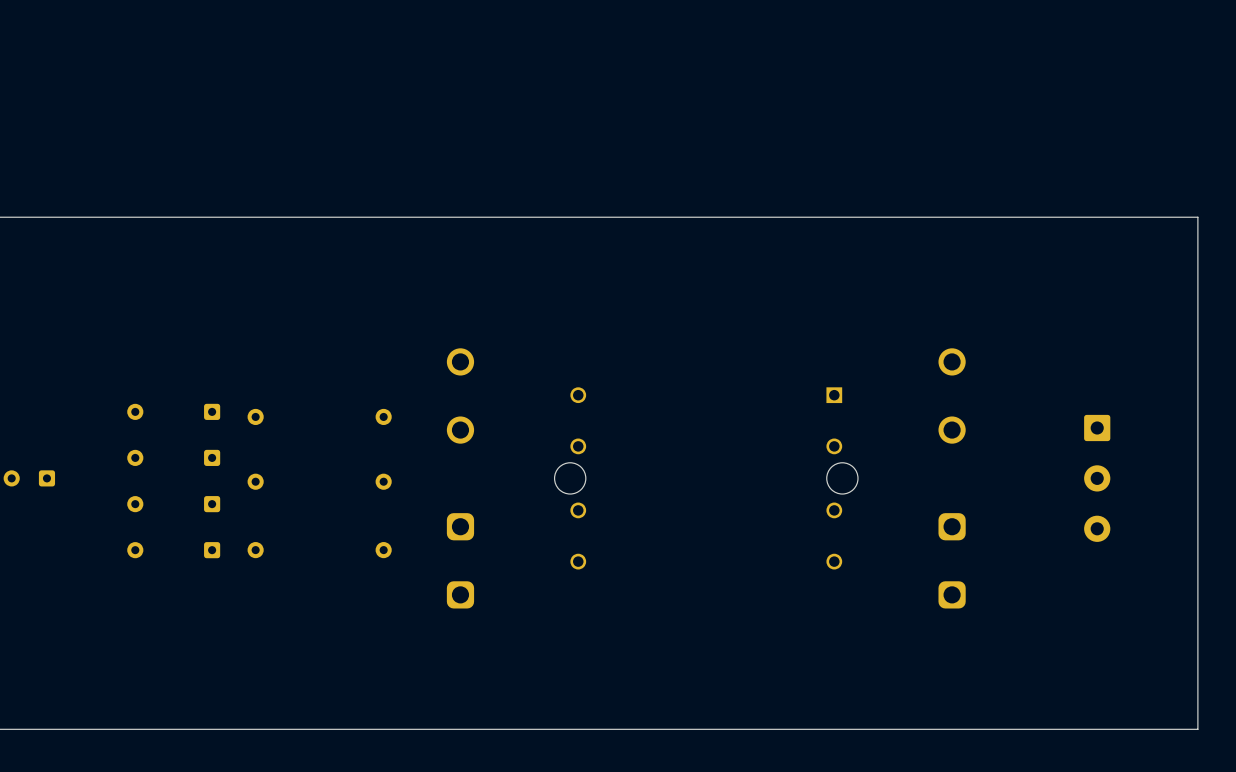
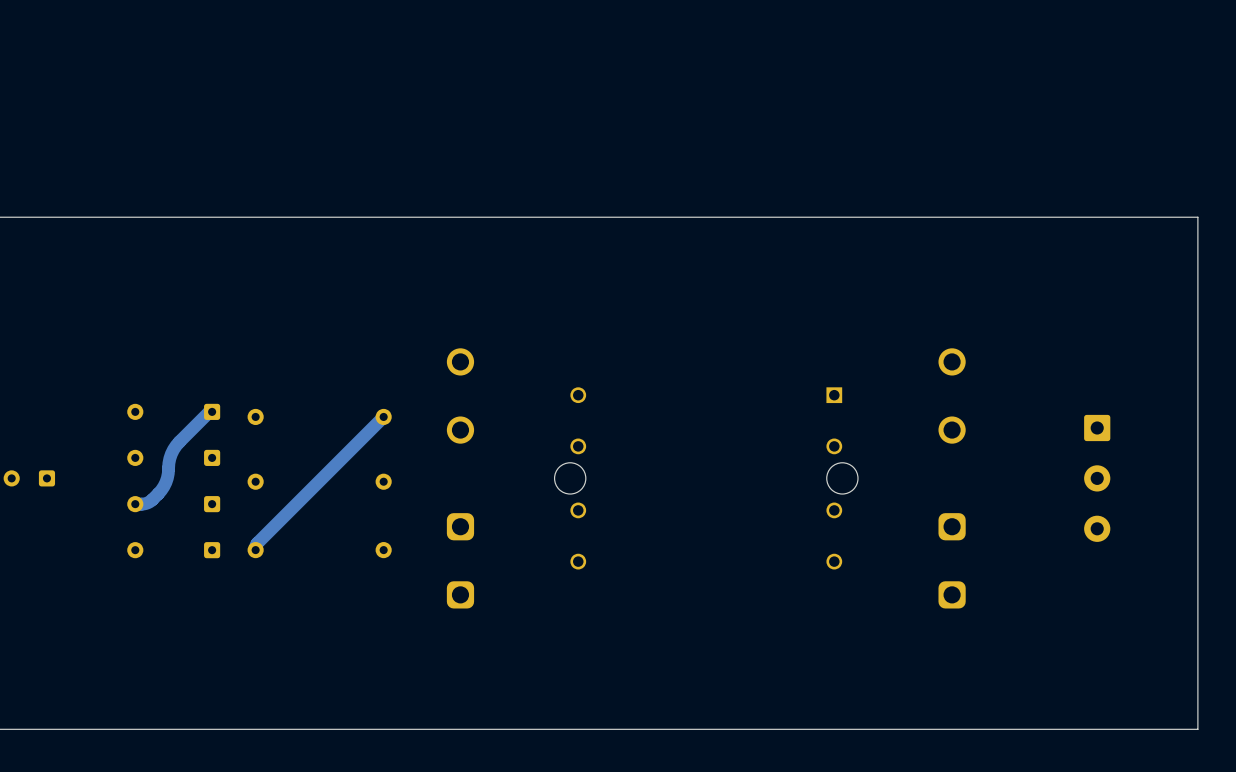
track: none -> (212, 411) (208, 412) (173, 449) (169, 458) (167, 478) (161, 490) (149, 502) (135, 504)
track: none -> (383, 416) (257, 543) (255, 550)

